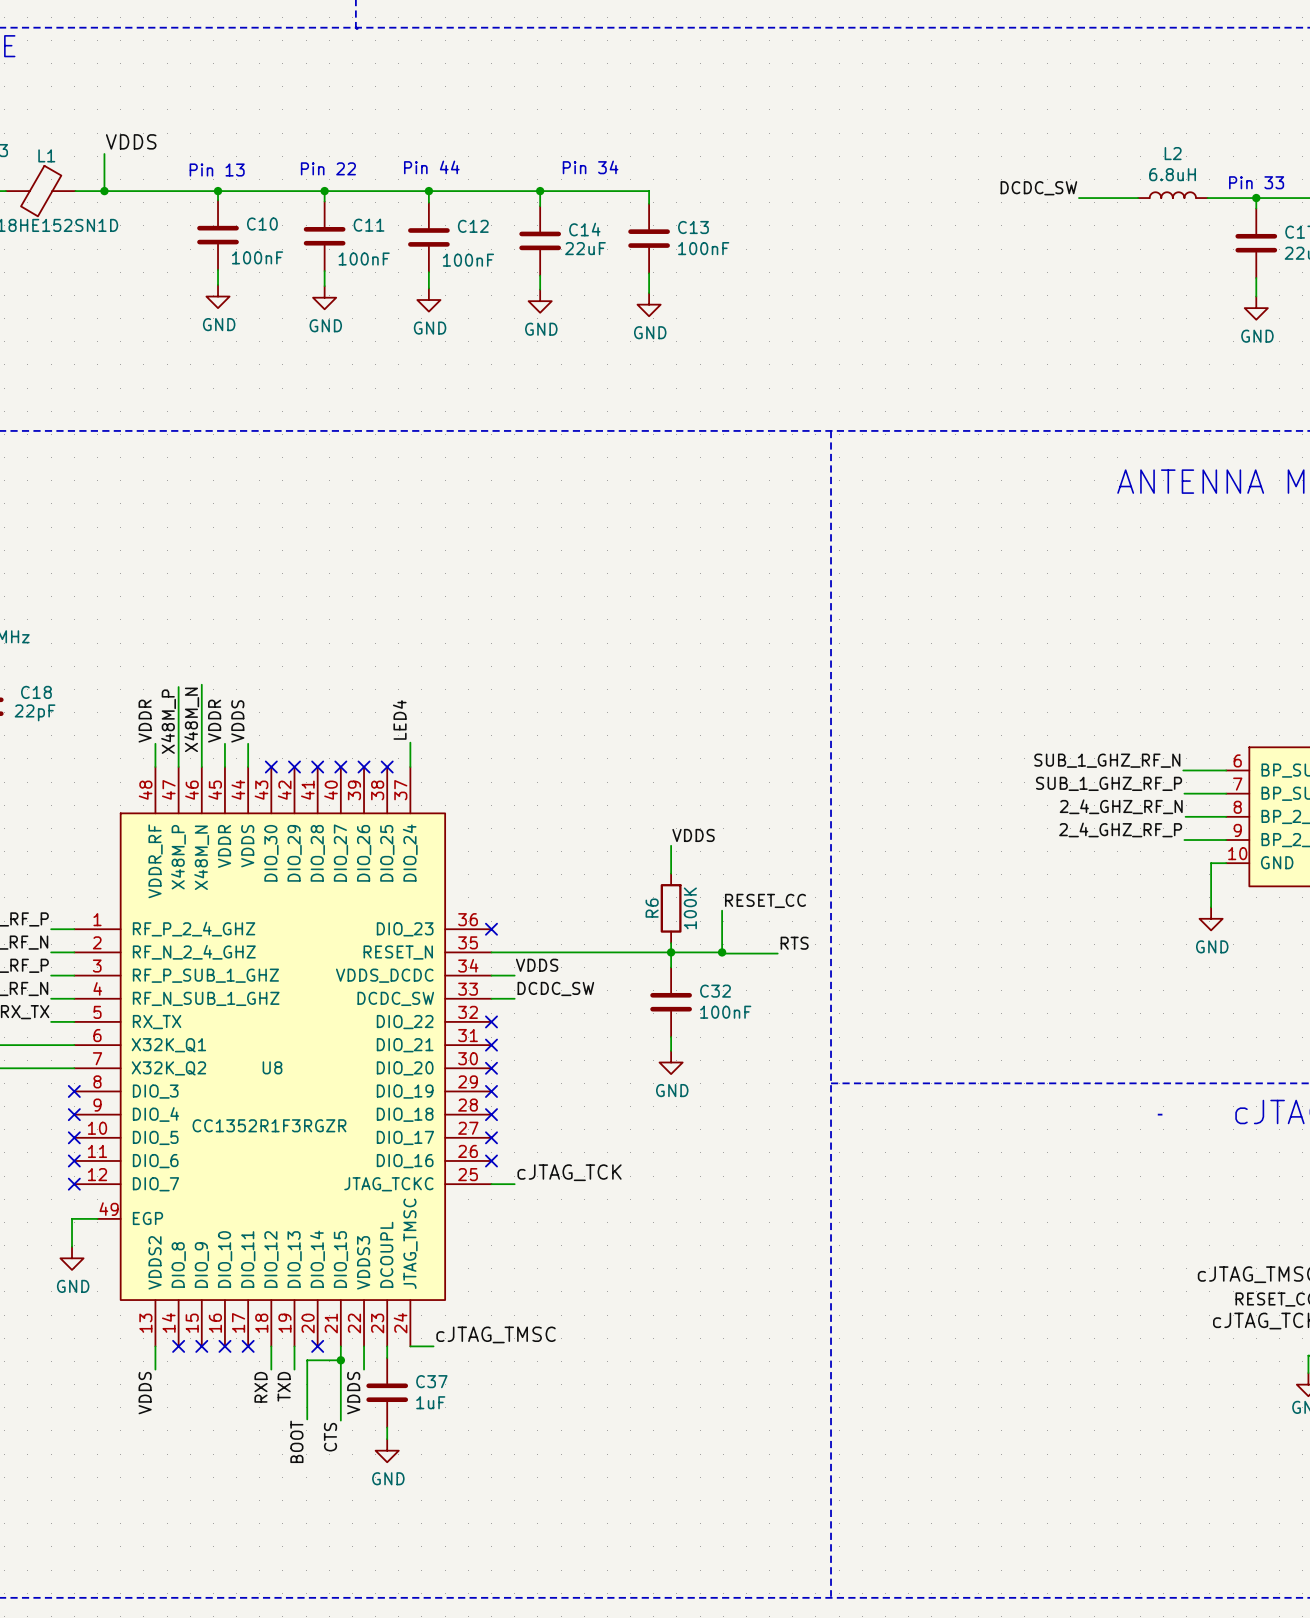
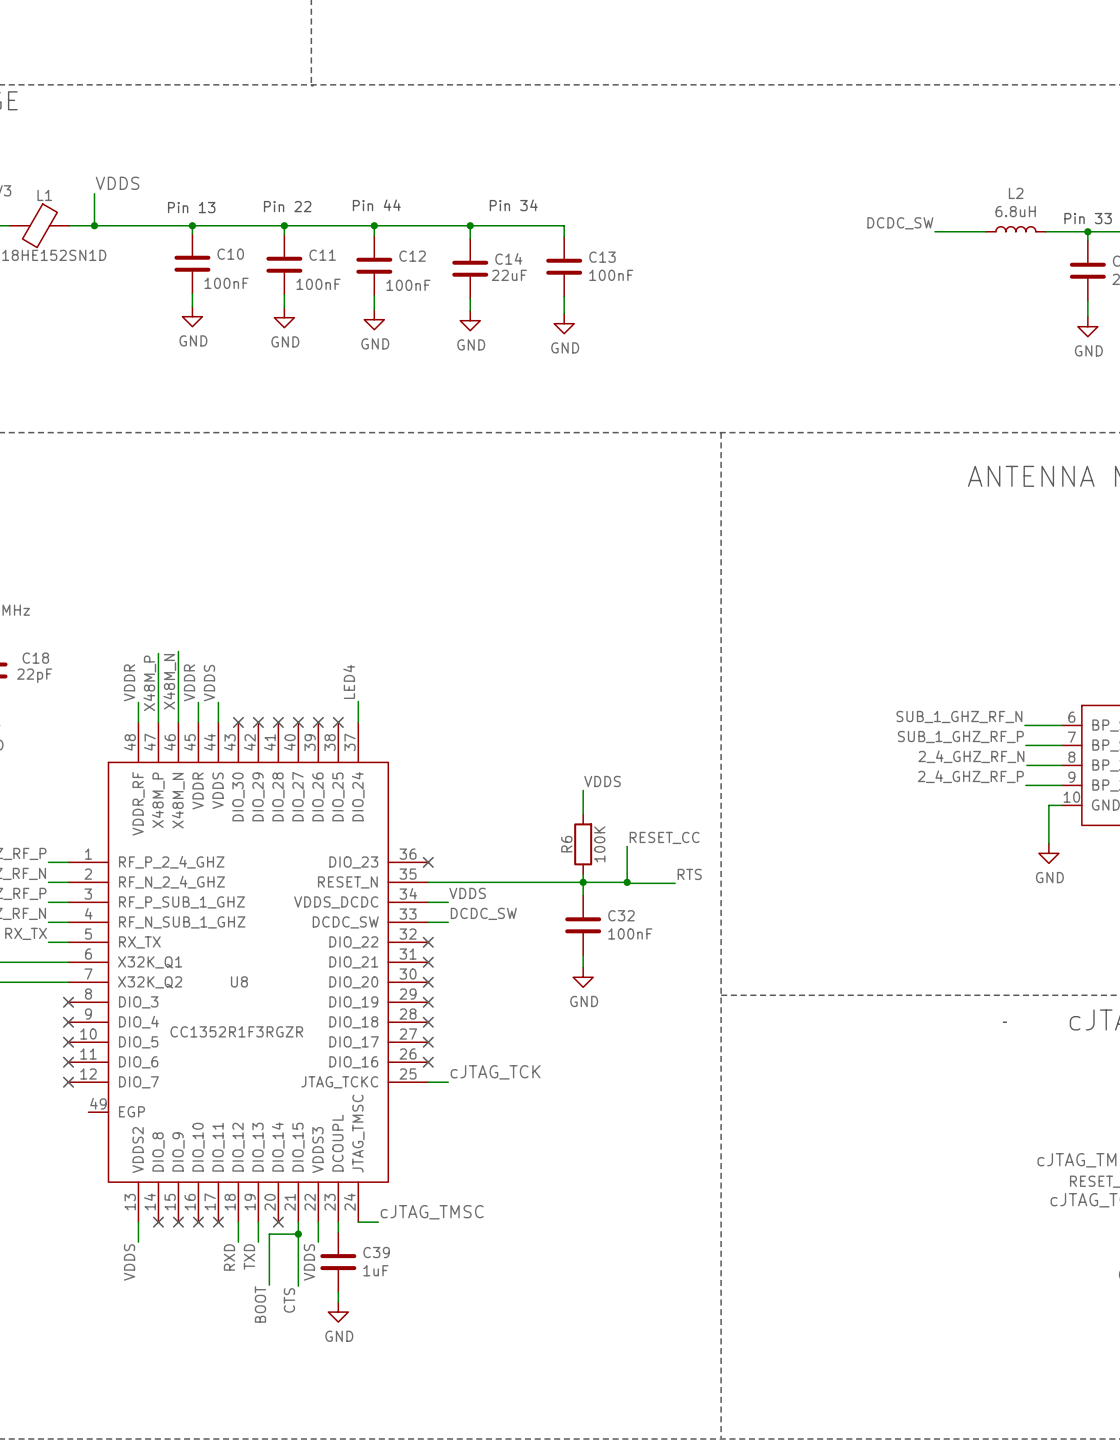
wire: (97, 1218) (72, 1218) (72, 1246) -> none
power symbol: GND (72, 1258) -> none
C37 name: C37 (431, 1381) -> C39 (376, 1252)

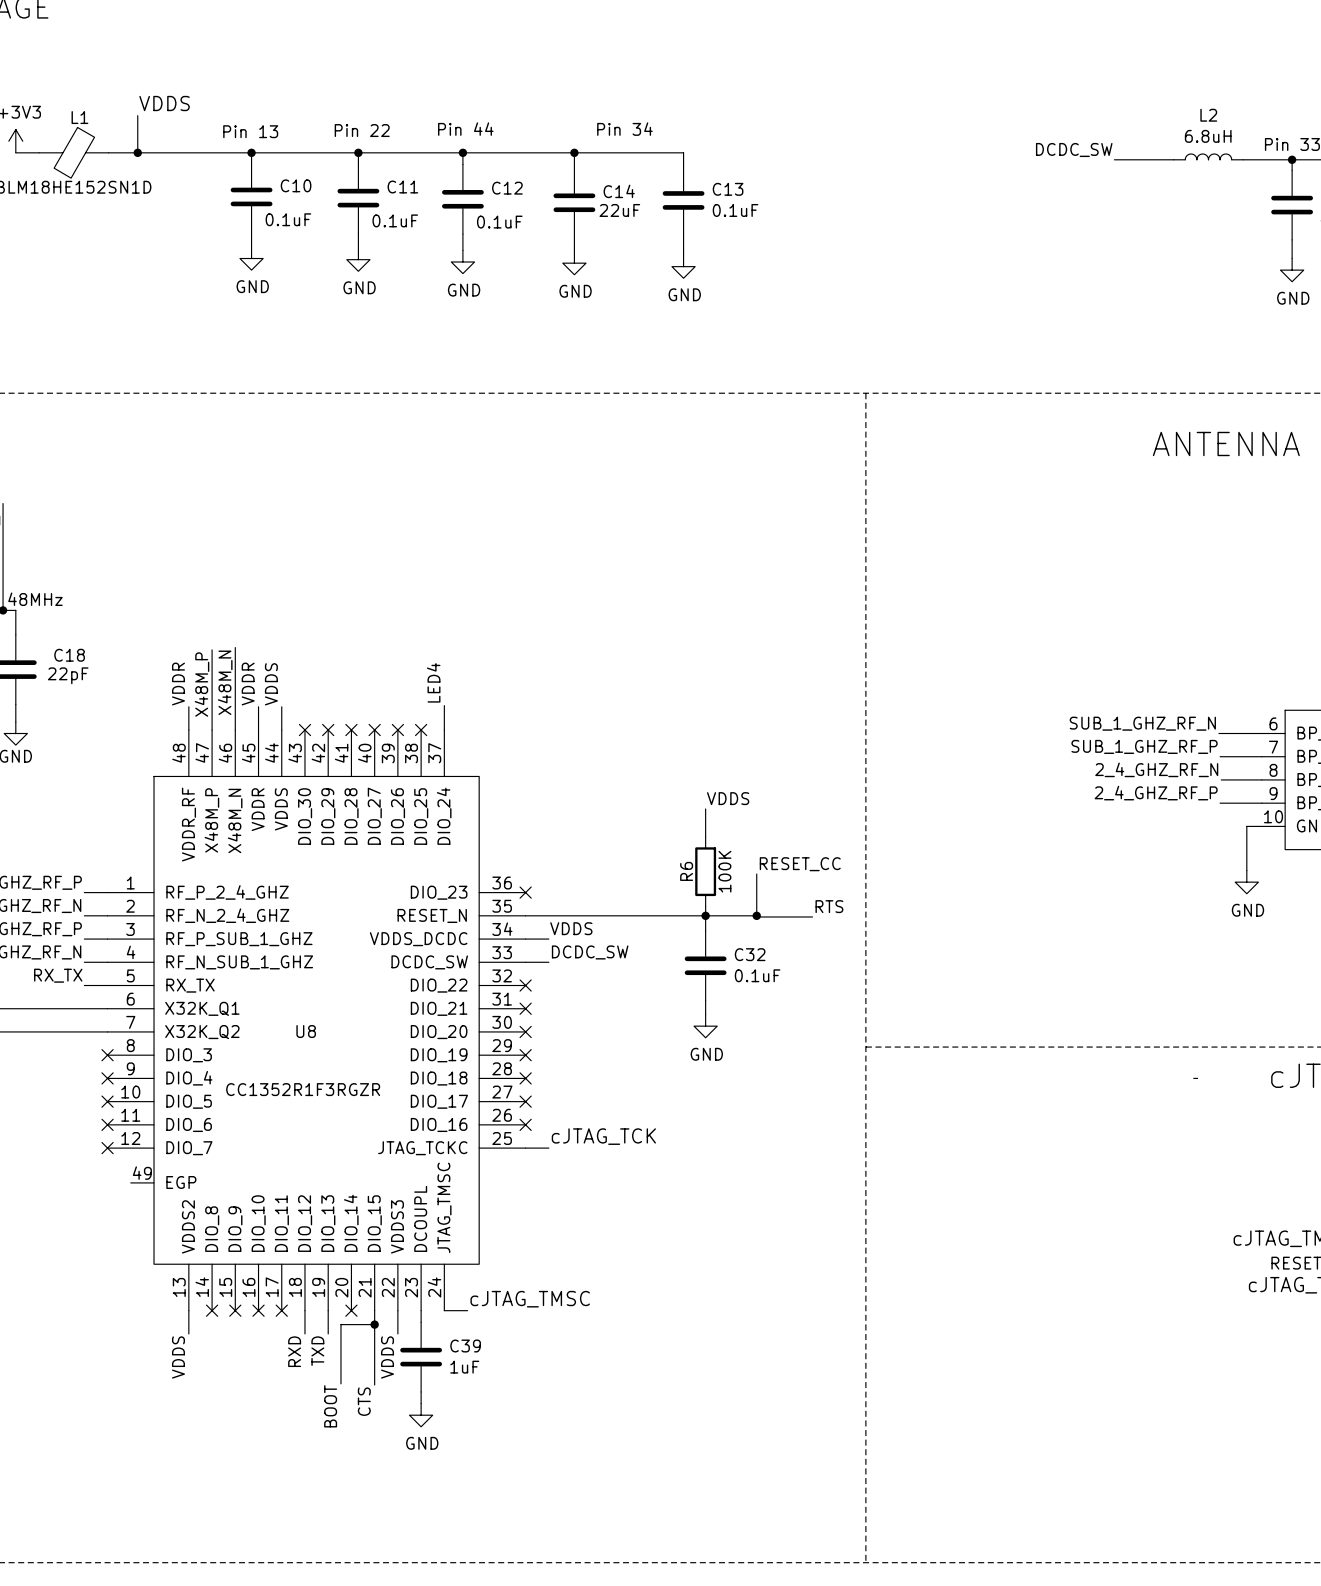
C13 value: 100nF (611, 275) -> 0.1uF (735, 210)
C10 value: 100nF (226, 283) -> 0.1uF (288, 219)
C11 value: 100nF (318, 284) -> 0.1uF (395, 220)
C12 value: 100nF (408, 285) -> 0.1uF (499, 222)
C32 value: 100nF (630, 933) -> 0.1uF (757, 975)

